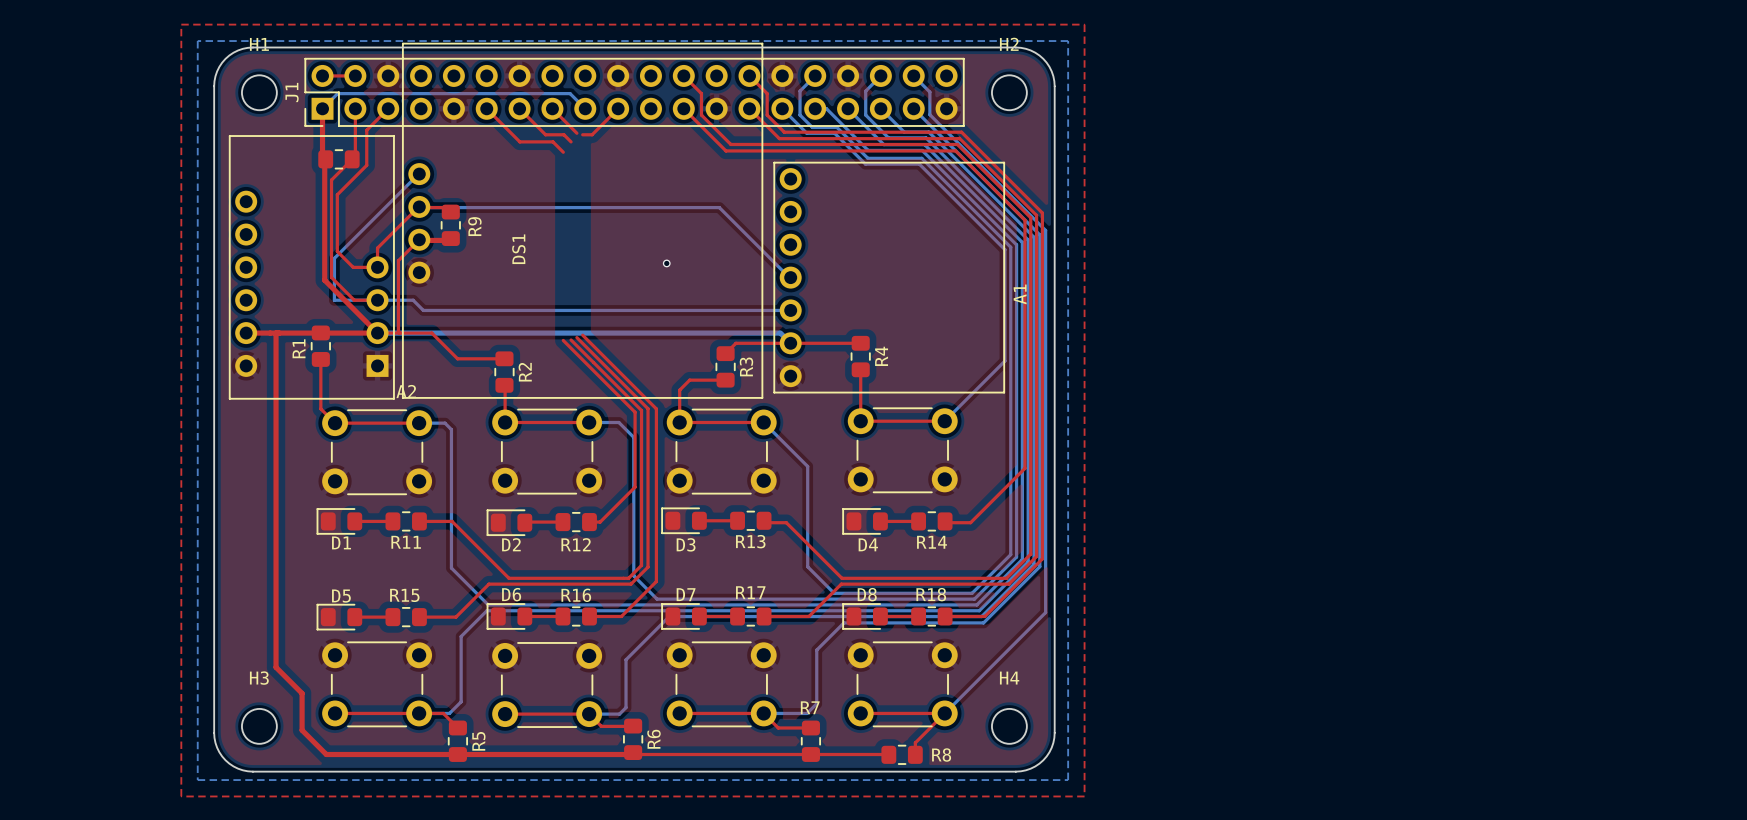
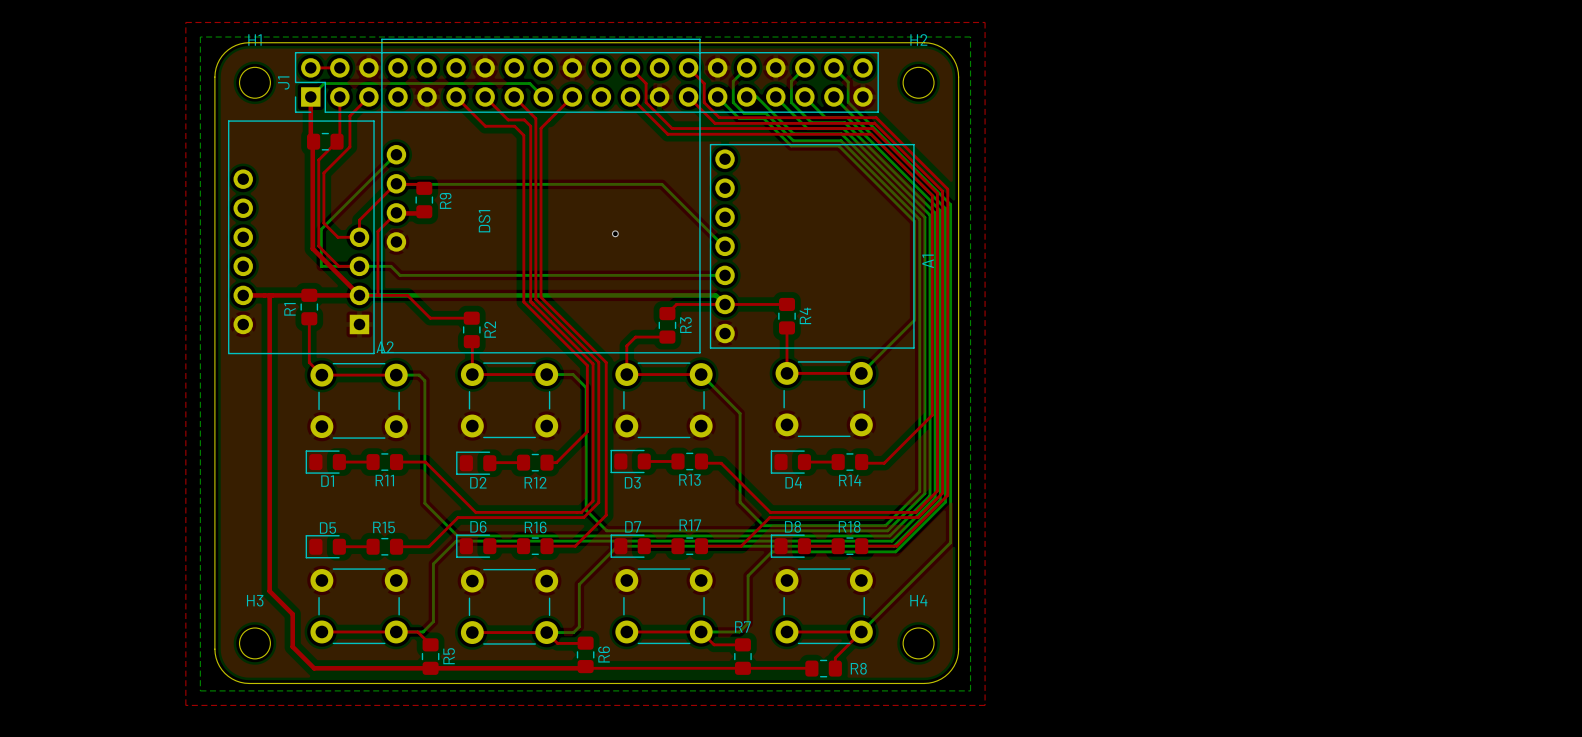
top track: none -> (535, 118) (535, 299)
top track: (582, 134) (592, 134) -> (541, 296) (541, 128) (549, 119)
top track: none -> (530, 126) (530, 301)
top track: none -> (523, 135) (523, 301)

